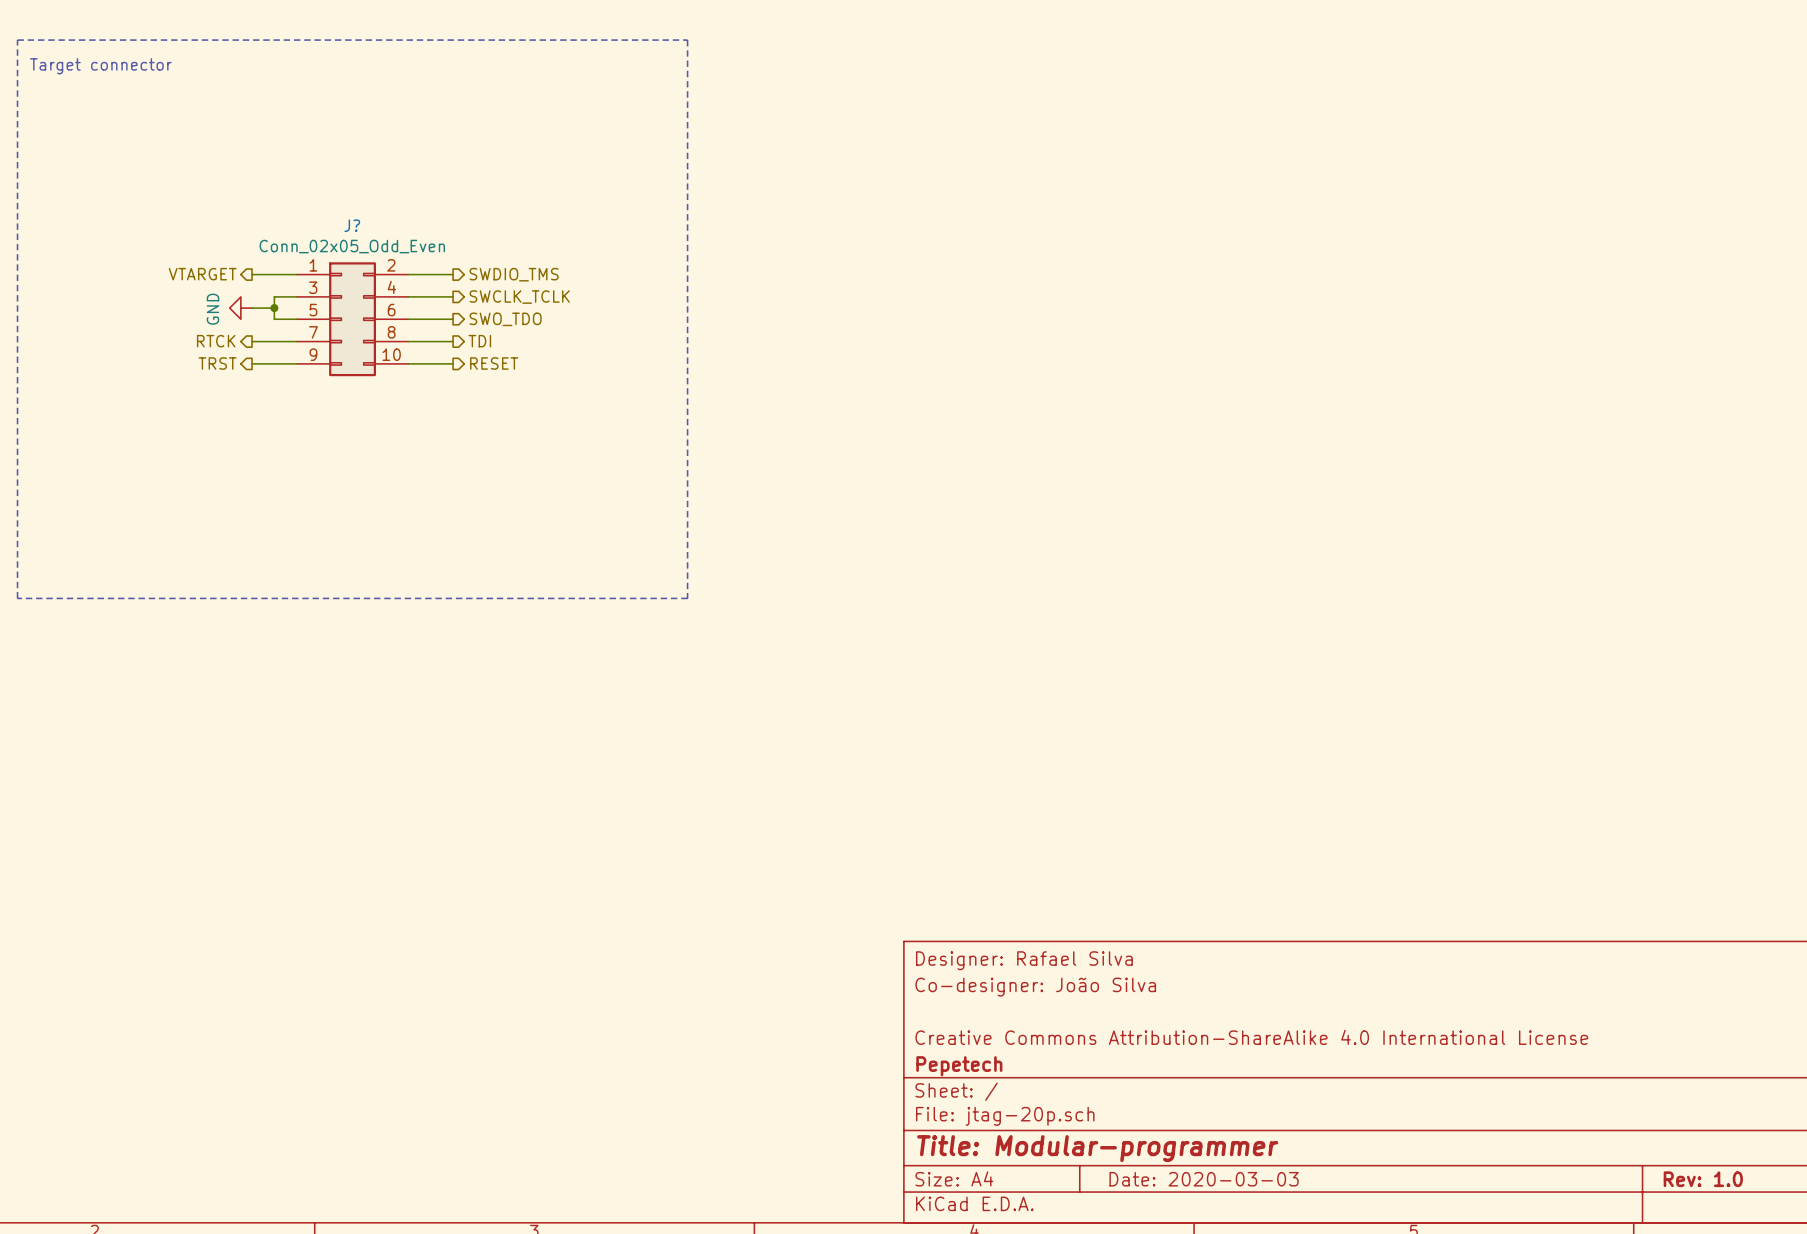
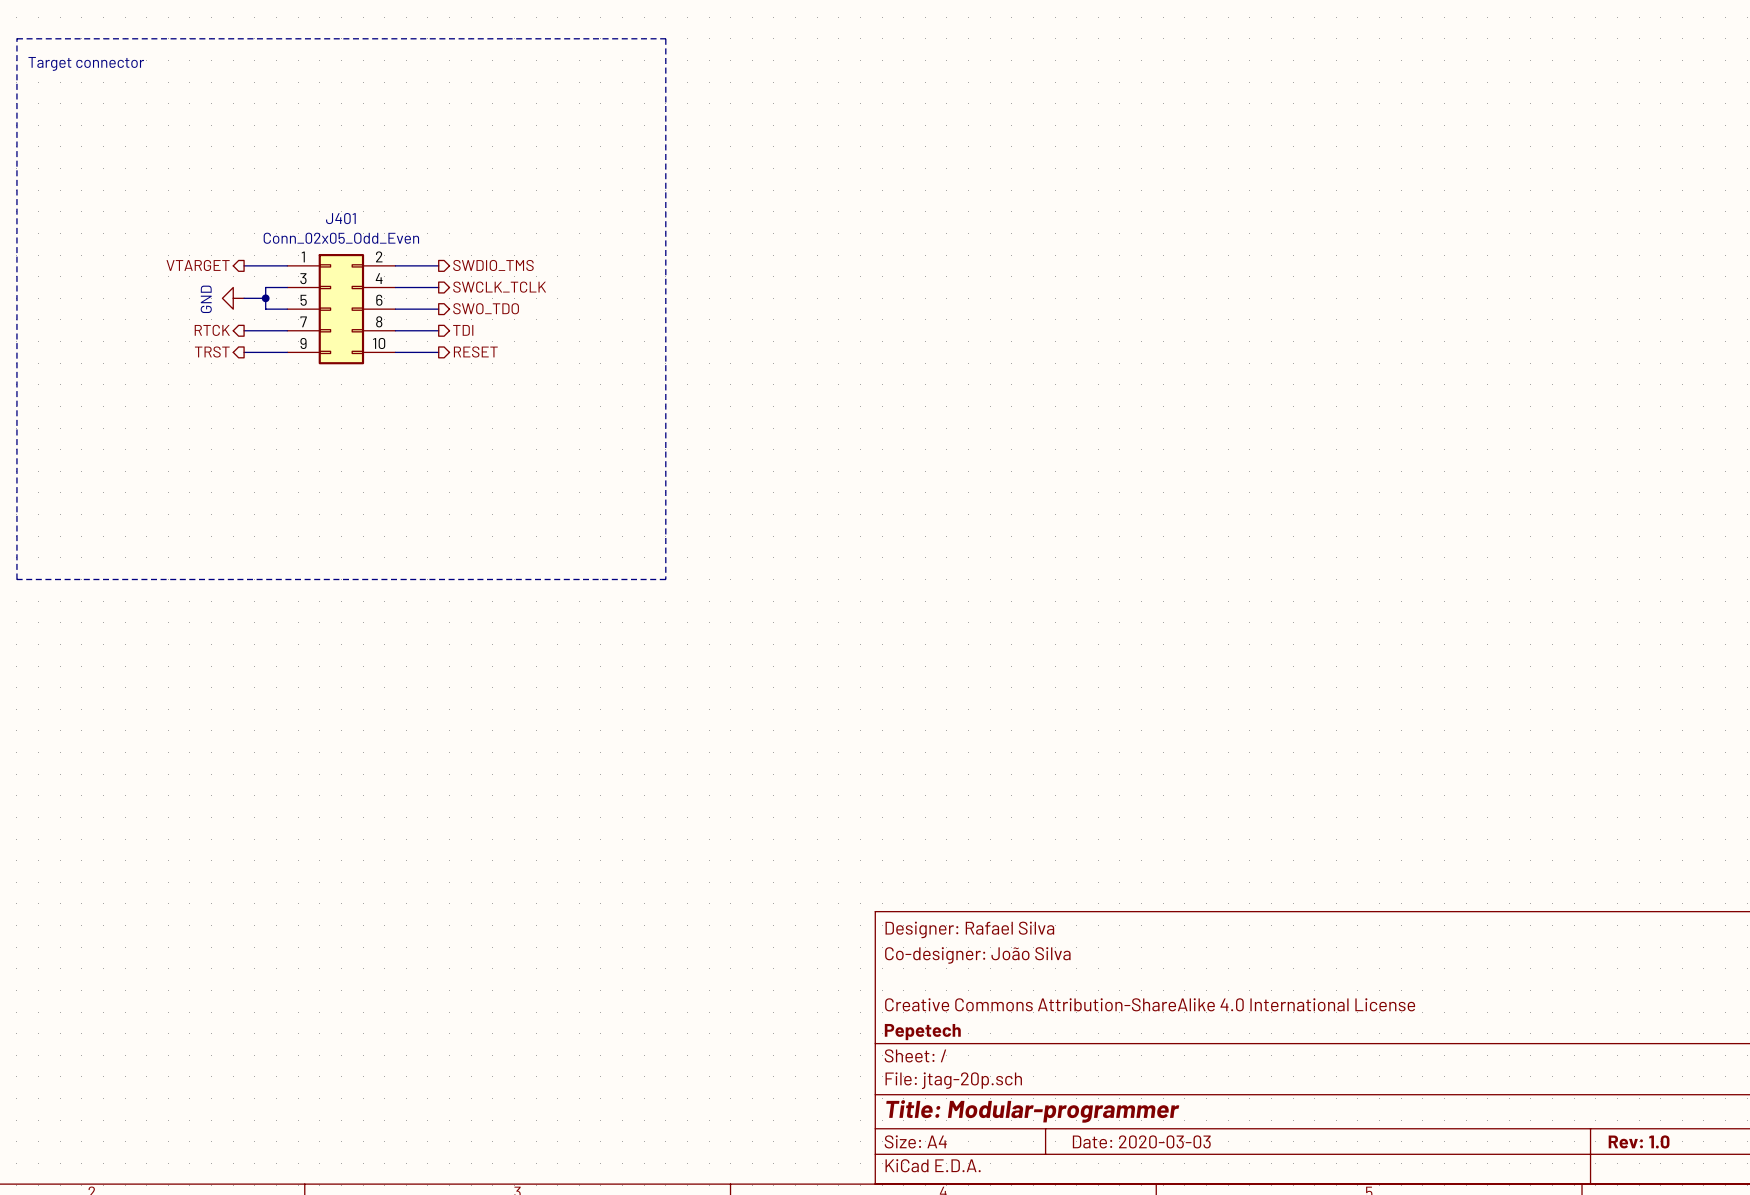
J? name: J? (352, 225) -> J401 (340, 218)

